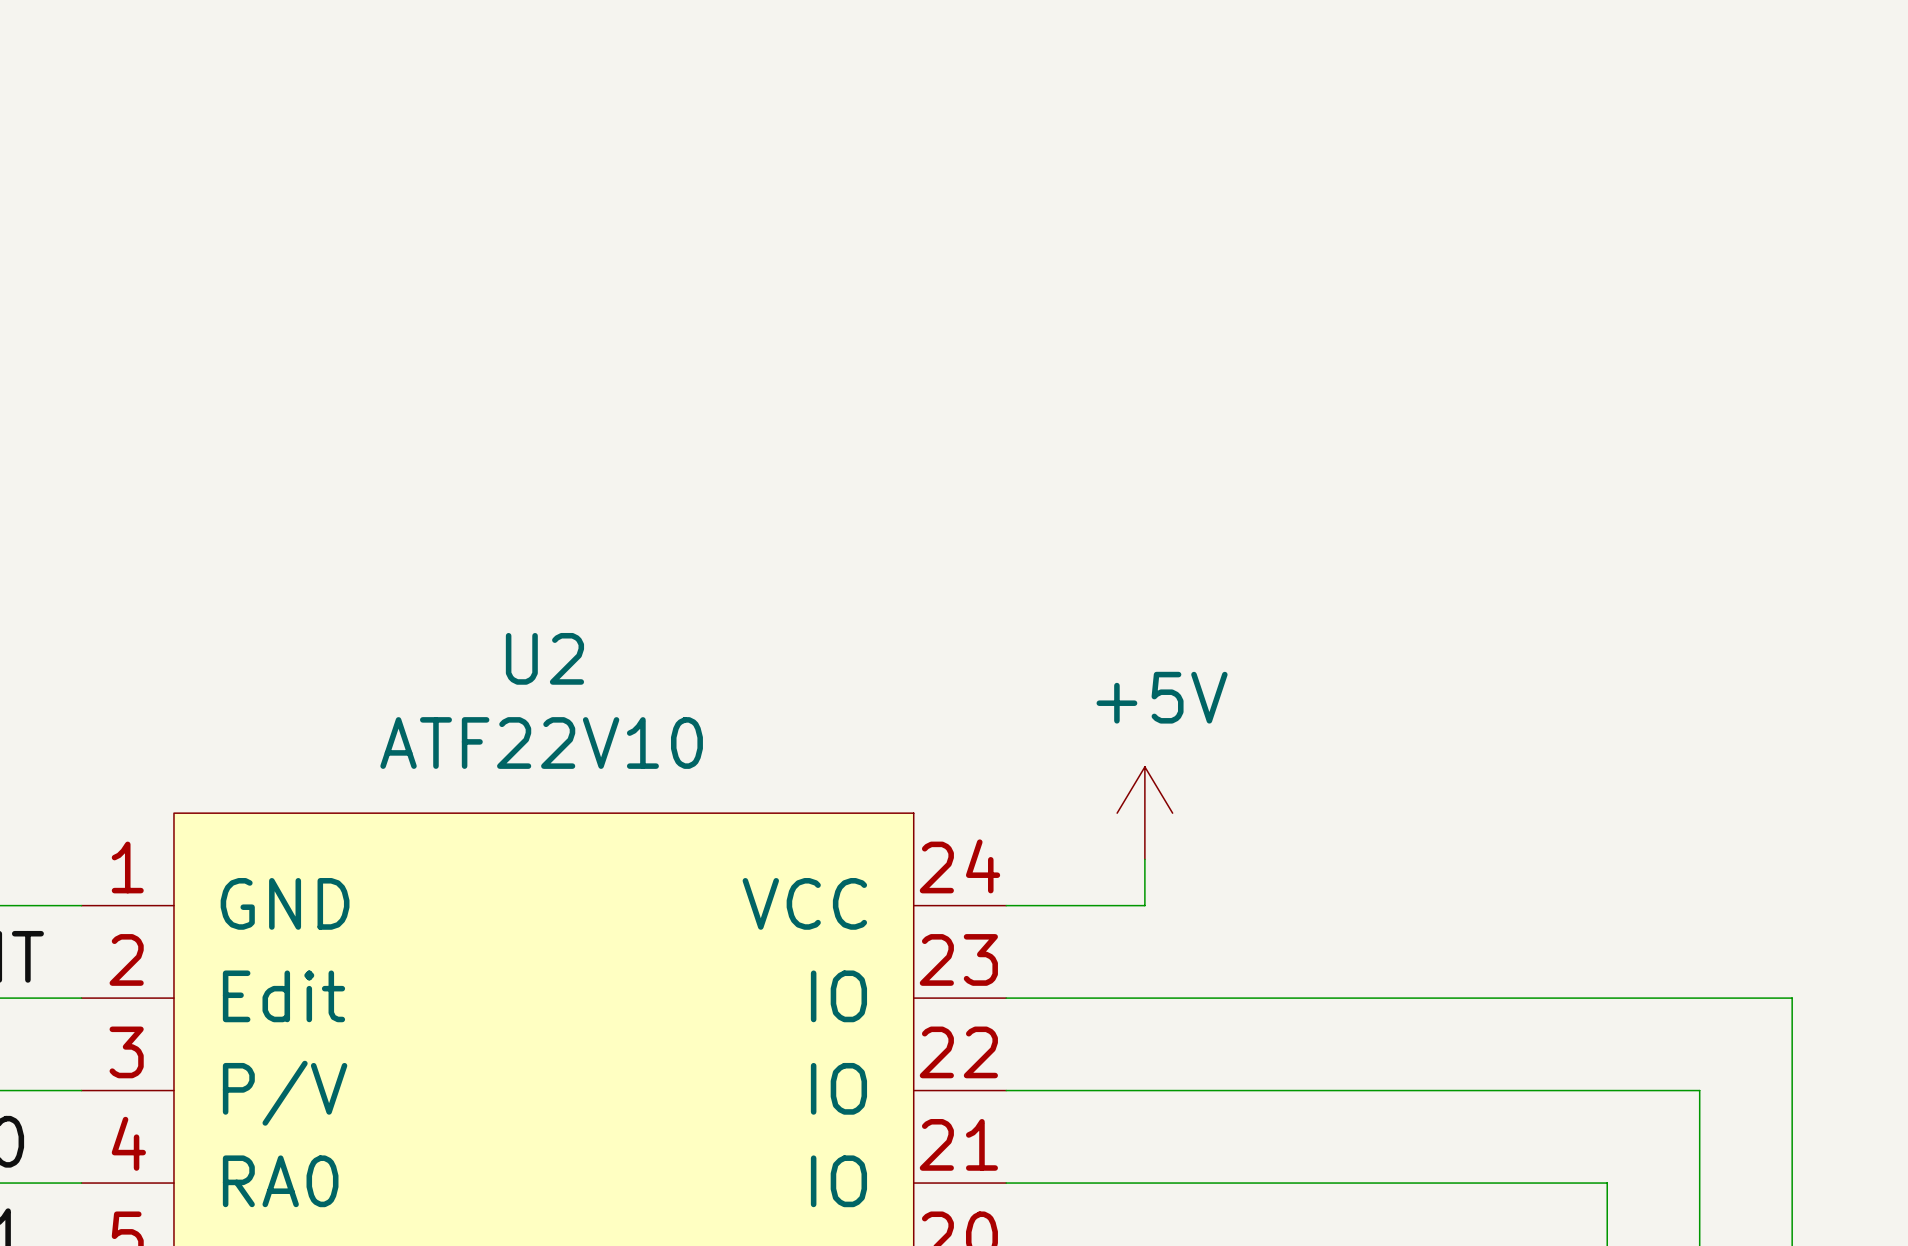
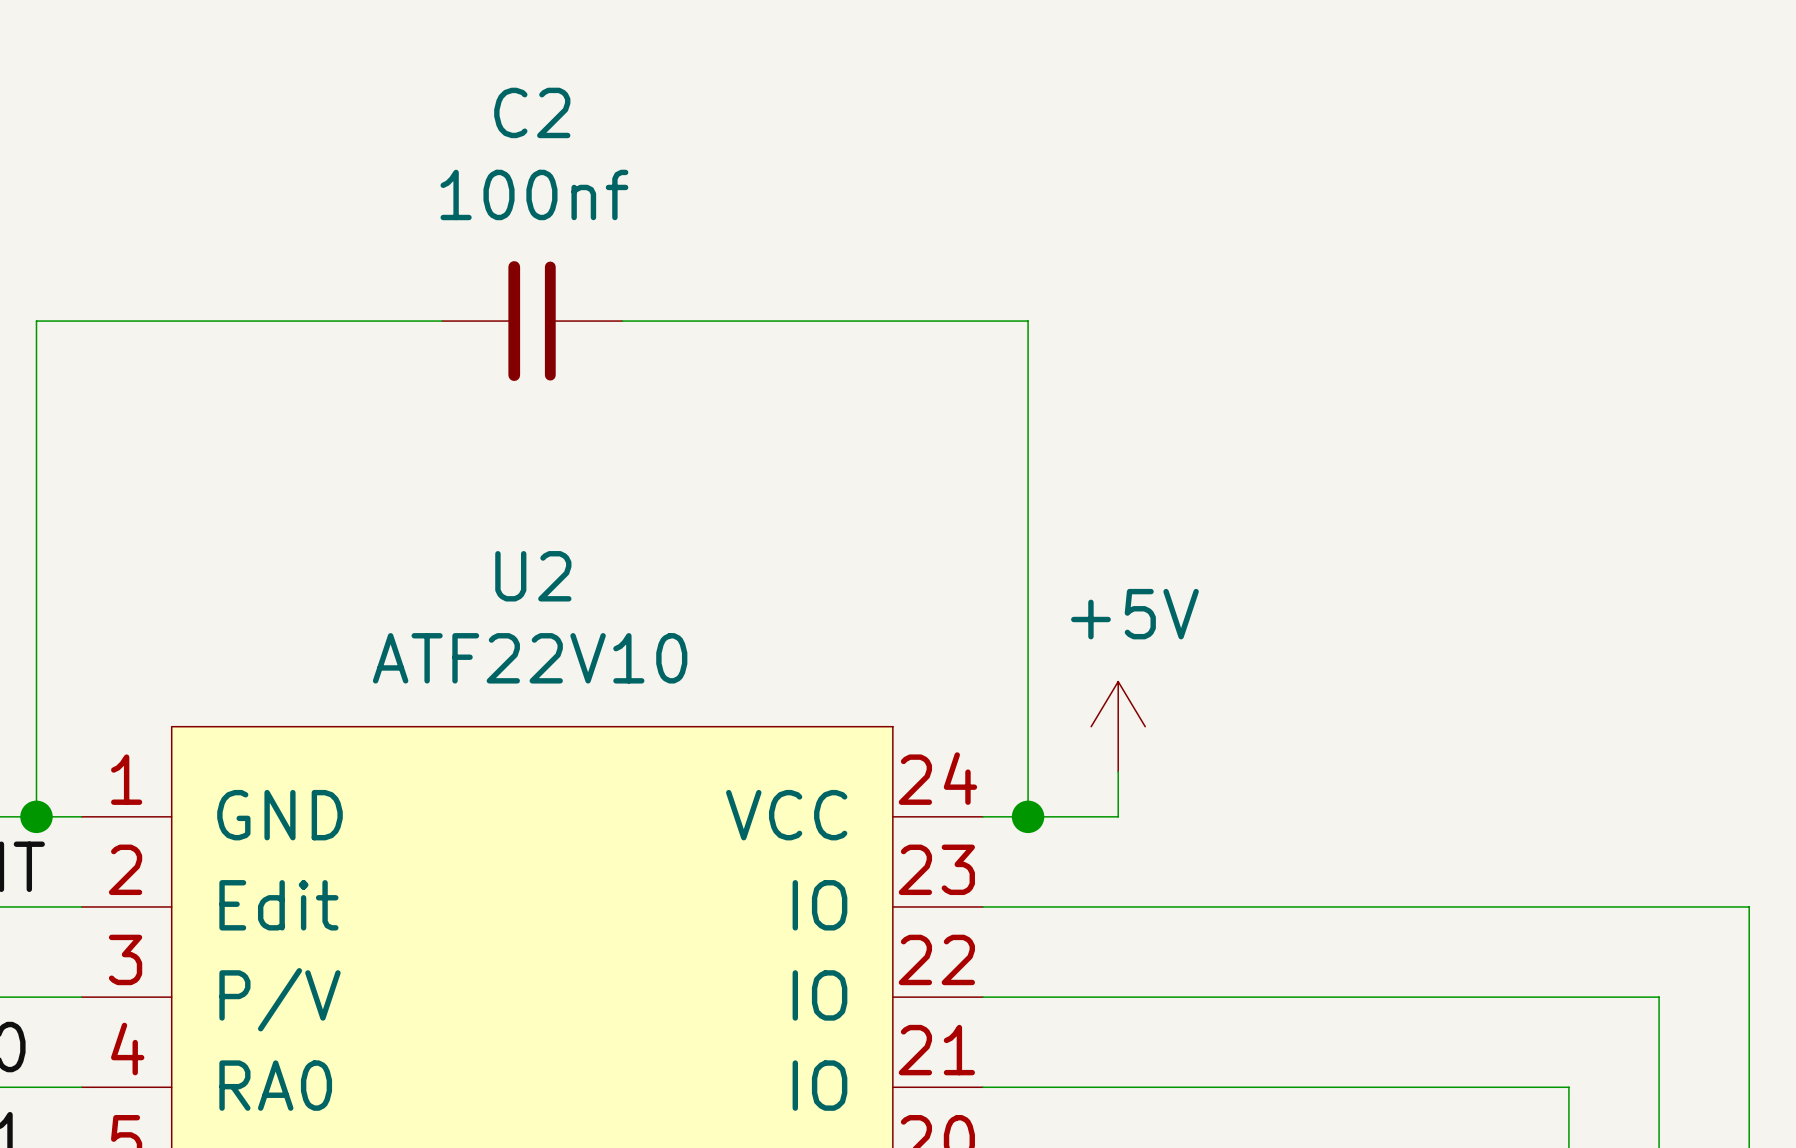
wire: none -> (442, 321) (36, 321) (36, 816)
C2: none -> 100nf (532, 321)
wire: none -> (622, 321) (1028, 321) (1028, 816)
junction: none -> (36, 816)
junction: none -> (1028, 816)

